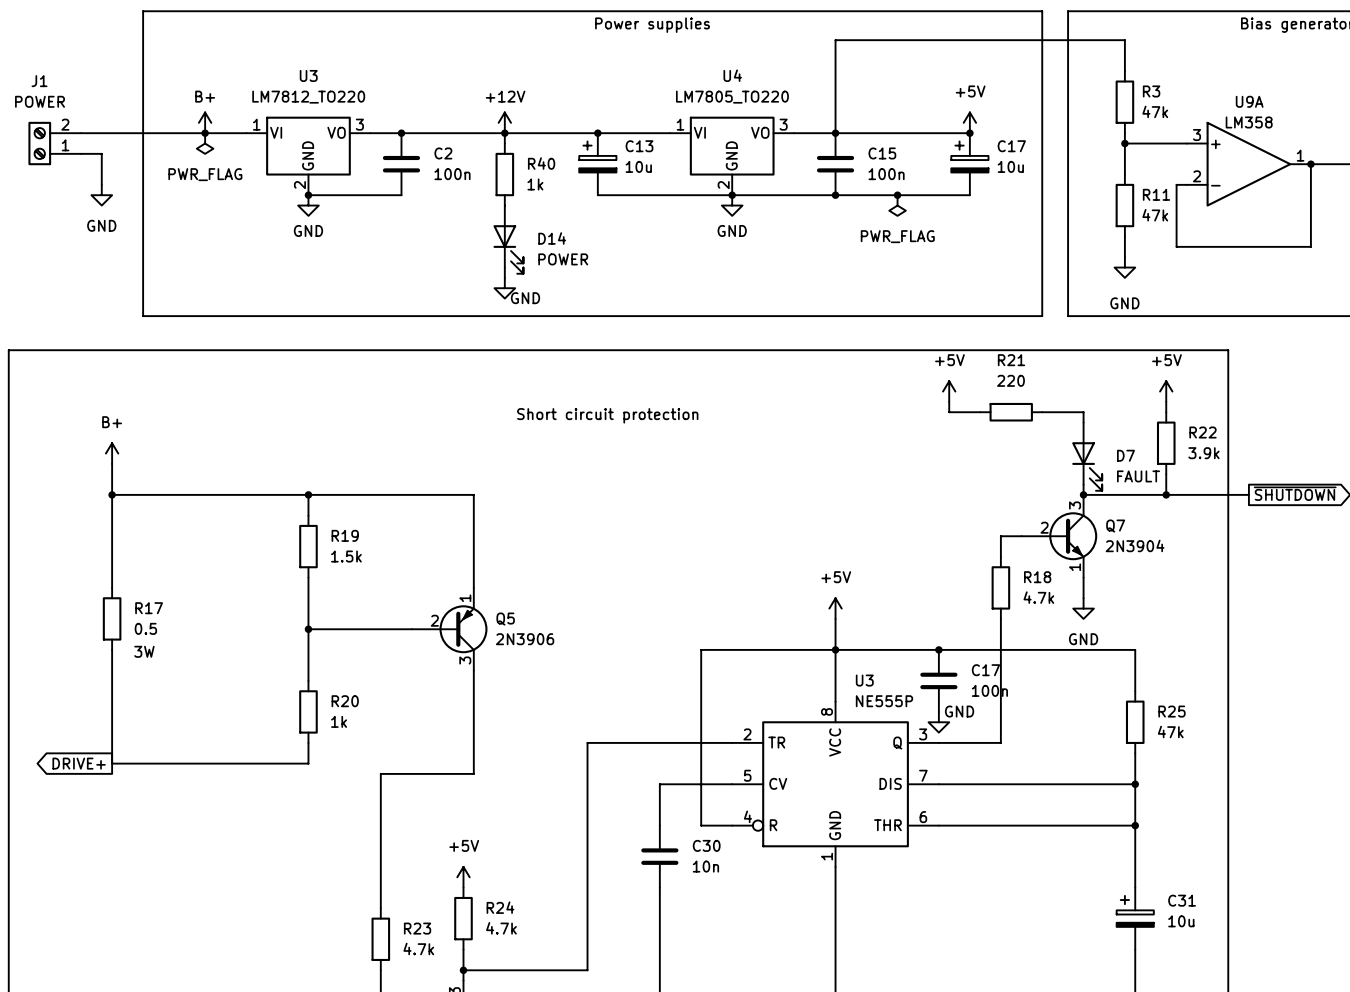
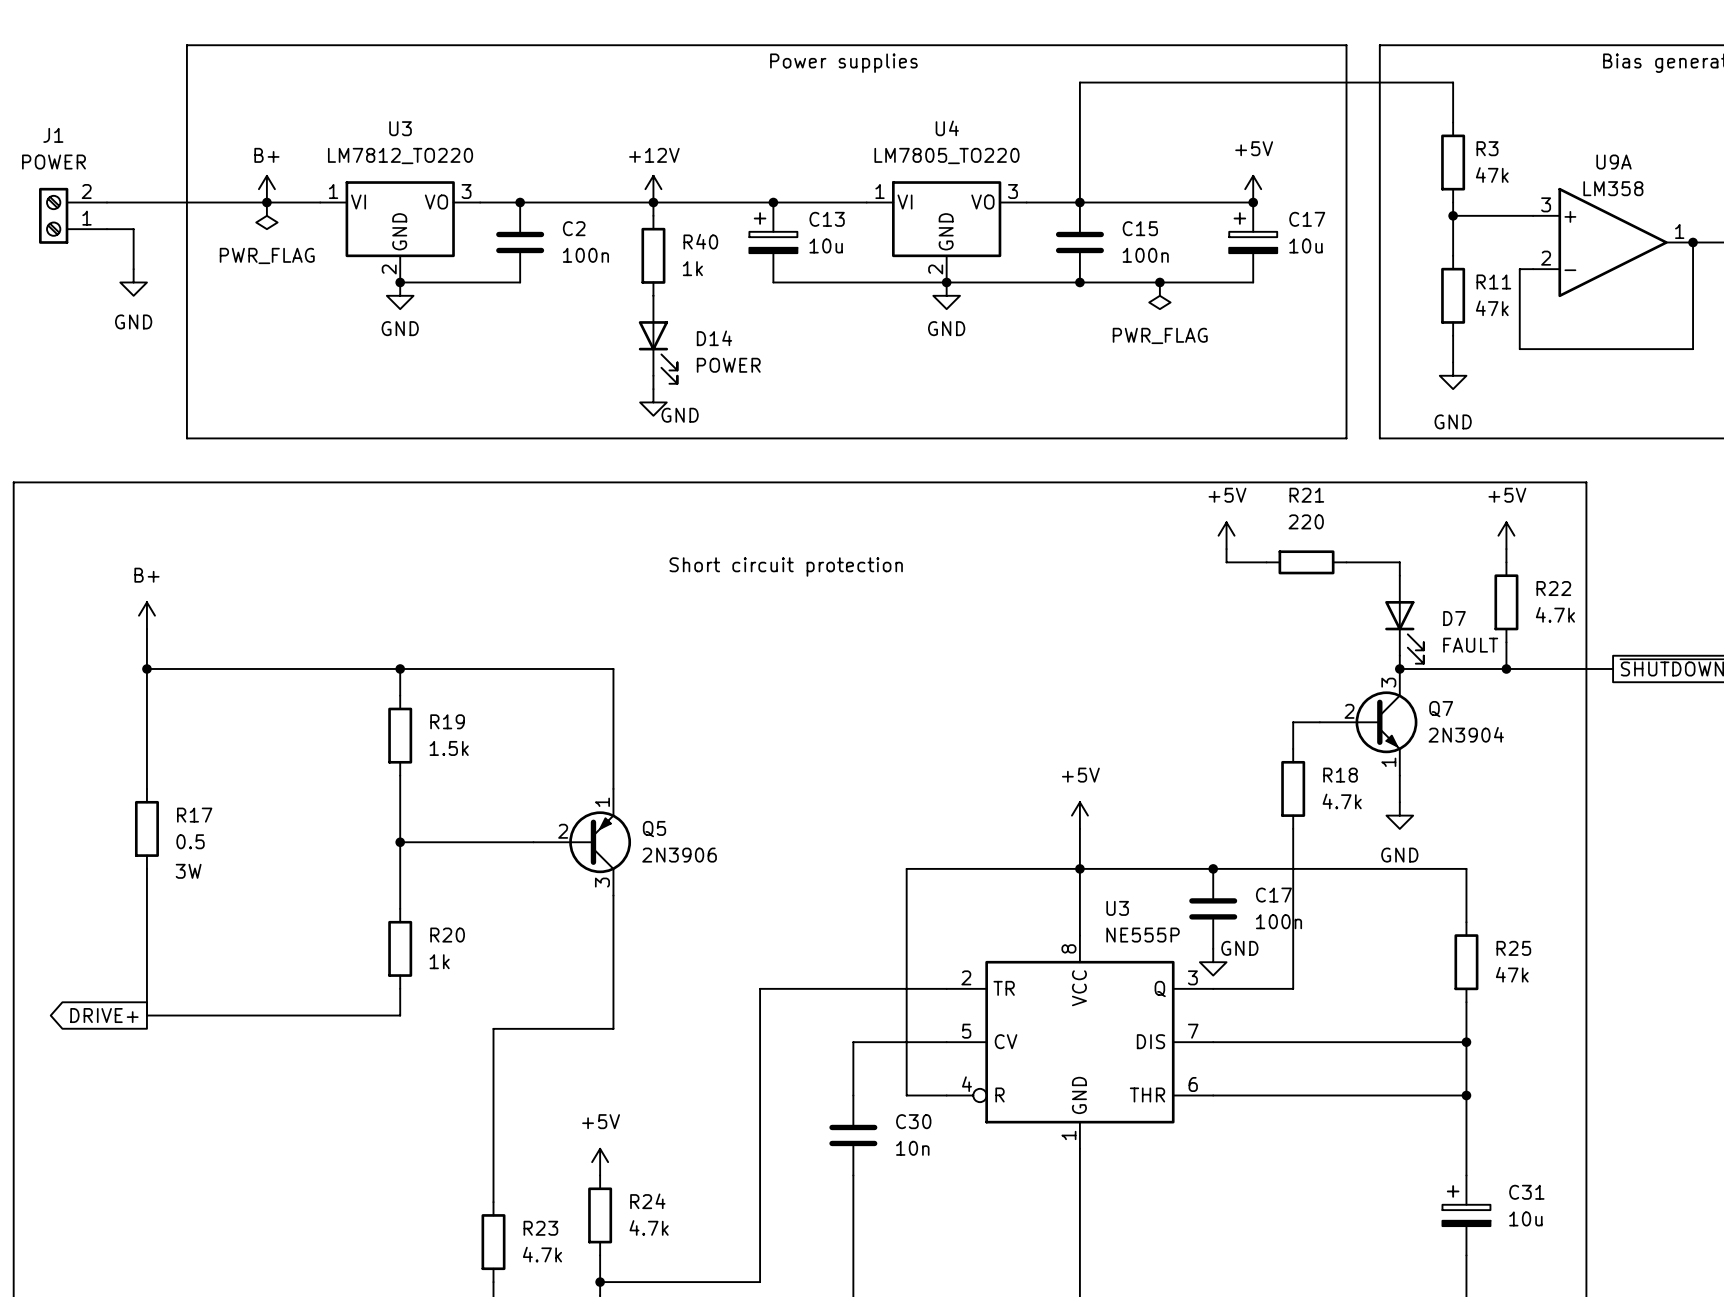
R22 value: 3.9k (1203, 453) -> 4.7k (1555, 614)

